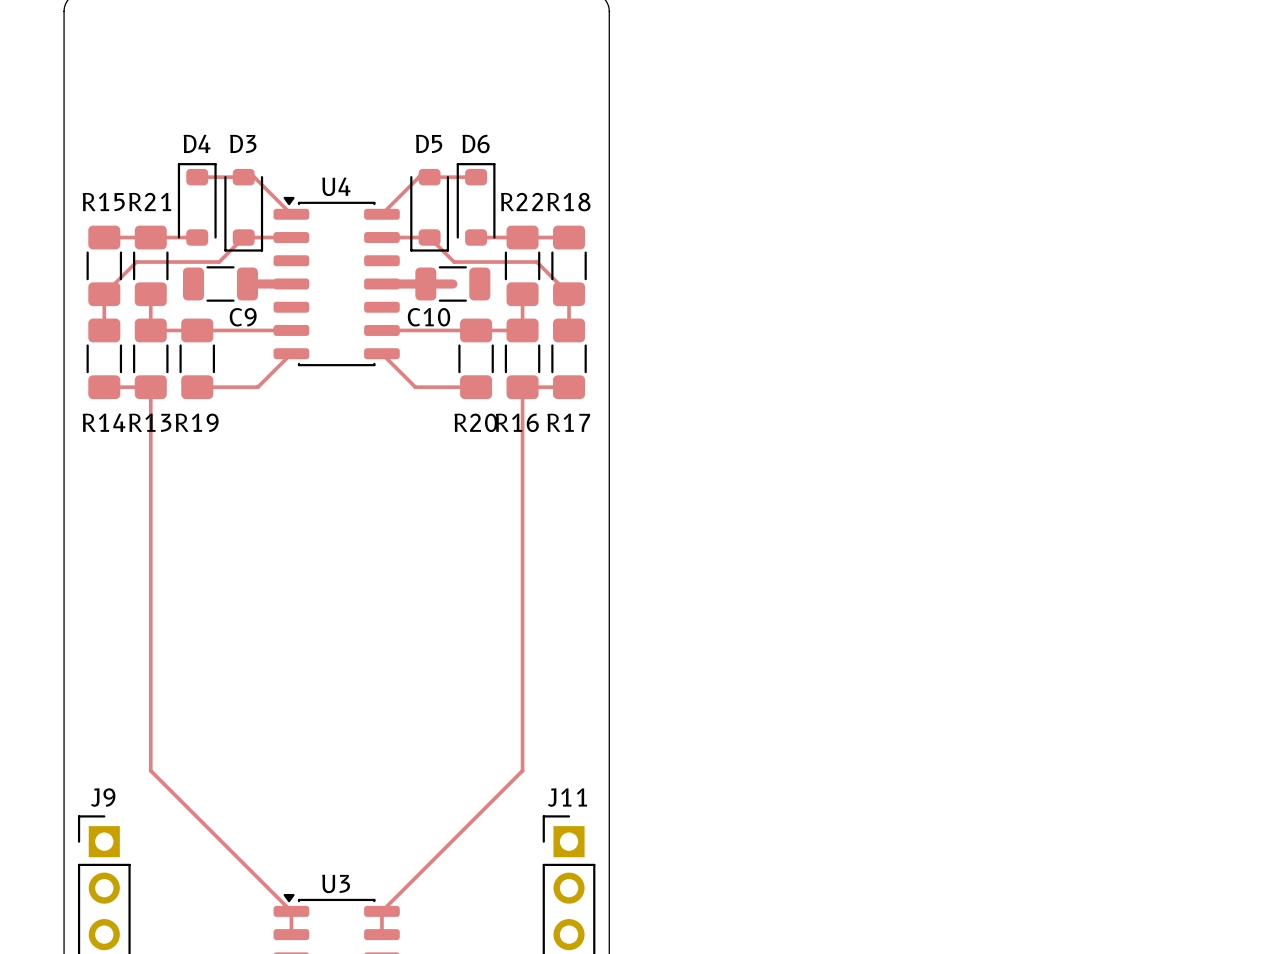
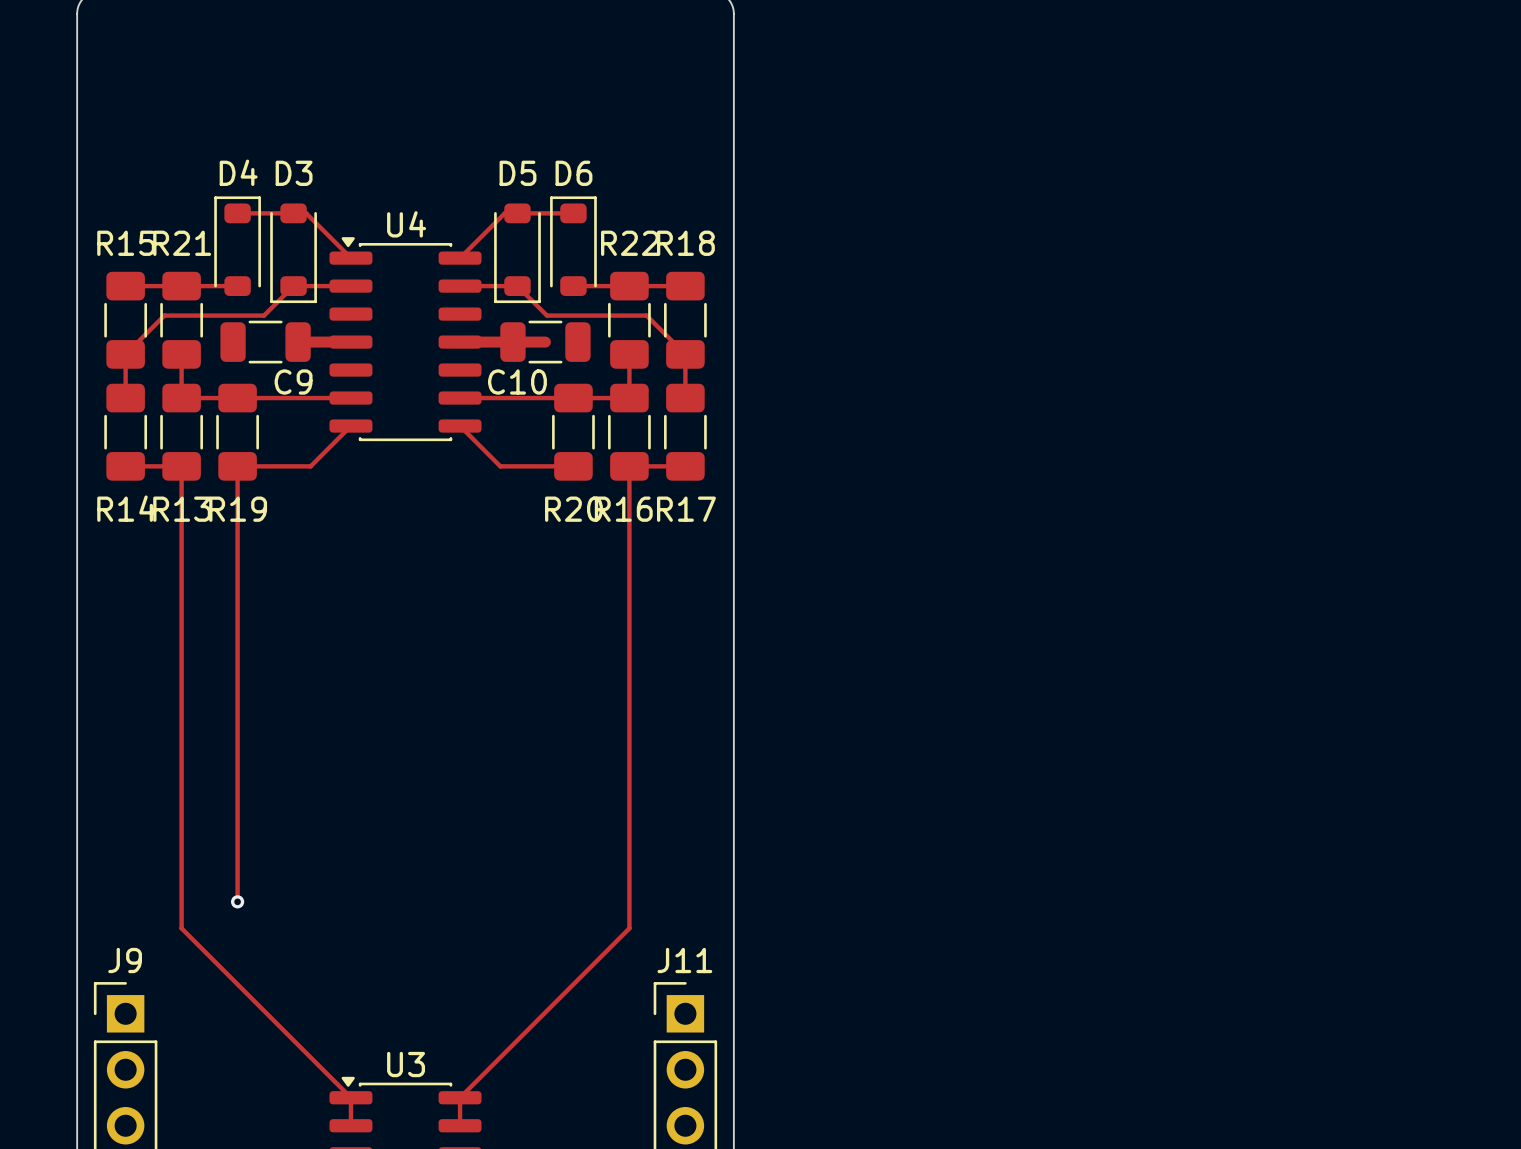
track: none -> (237, 466) (237, 901)
via: none -> (237, 901)

